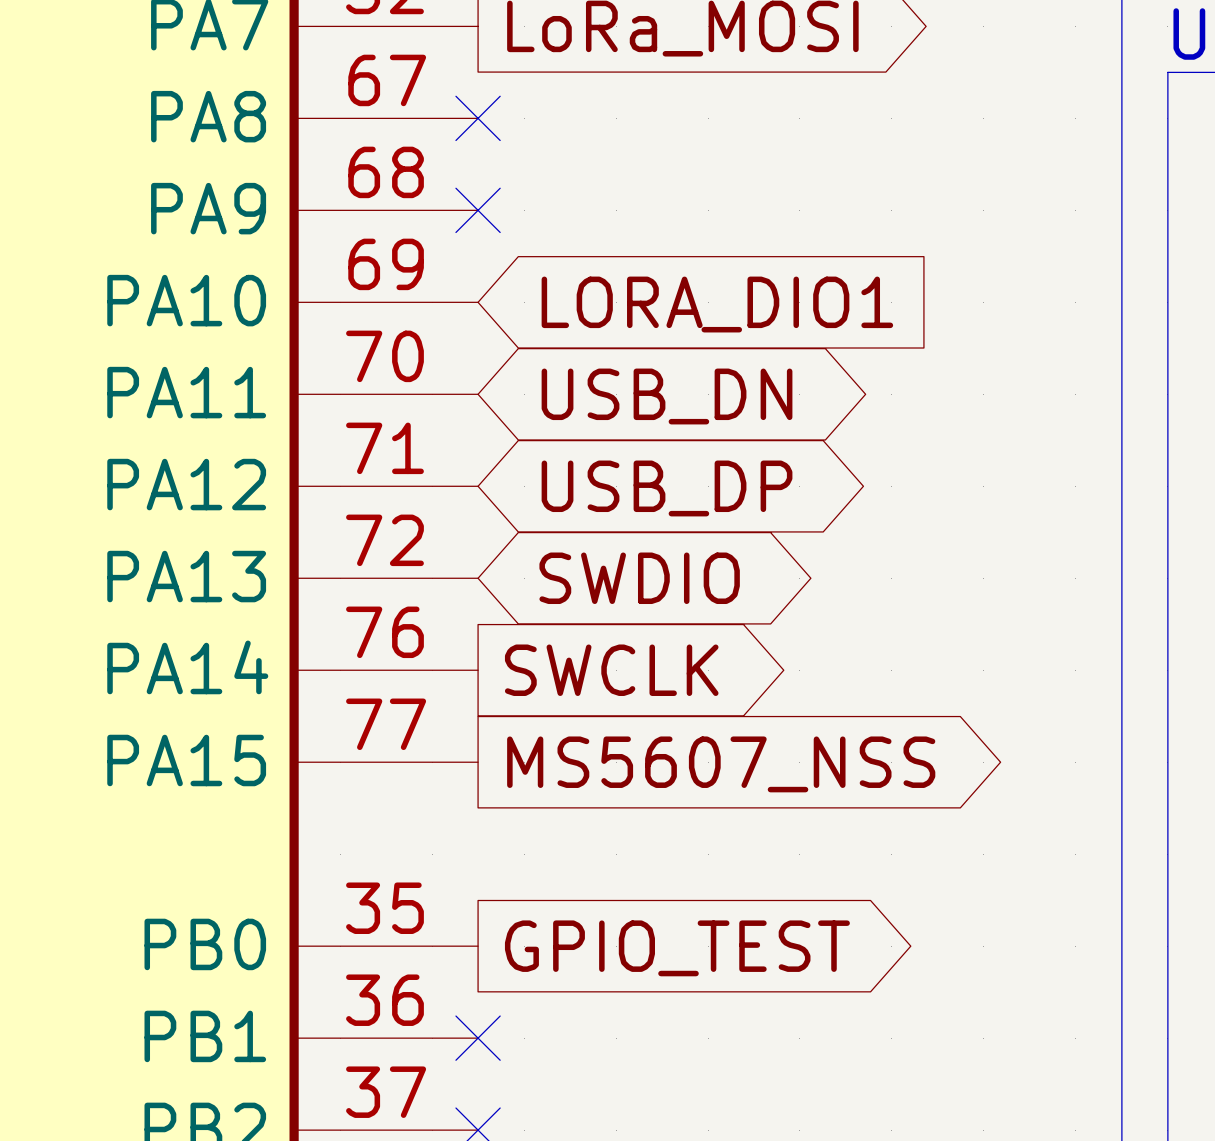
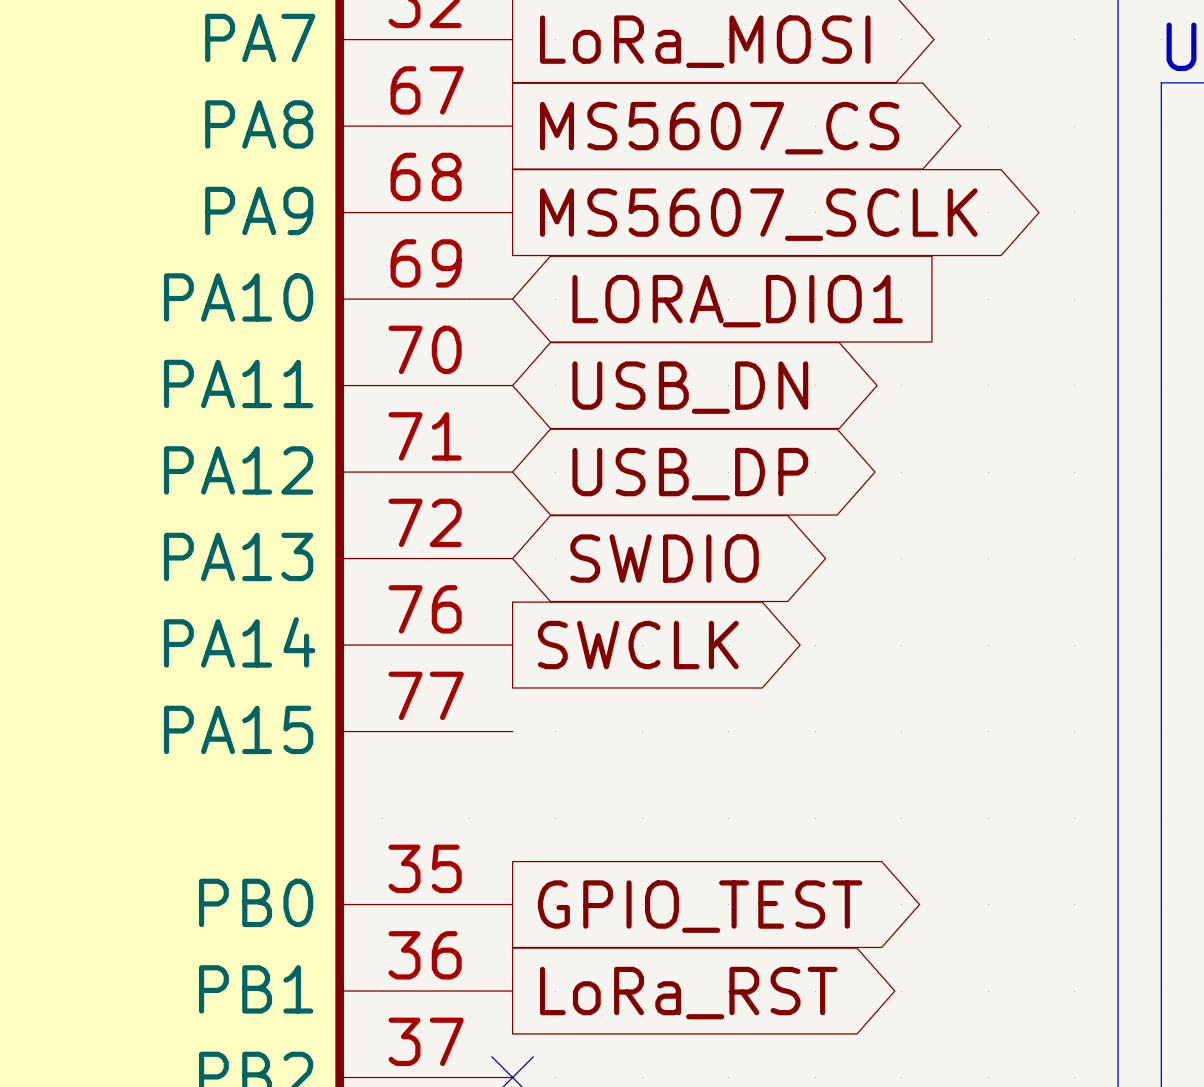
no-connect mark: (478, 118) -> none
global label: none -> MS5607_CS (719, 128)
no-connect mark: (478, 210) -> none
global label: none -> MS5607_SCLK (758, 214)
global label: MS5607_NSS (721, 764) -> none
no-connect mark: (478, 1038) -> none
global label: none -> LoRa_RST (688, 993)

